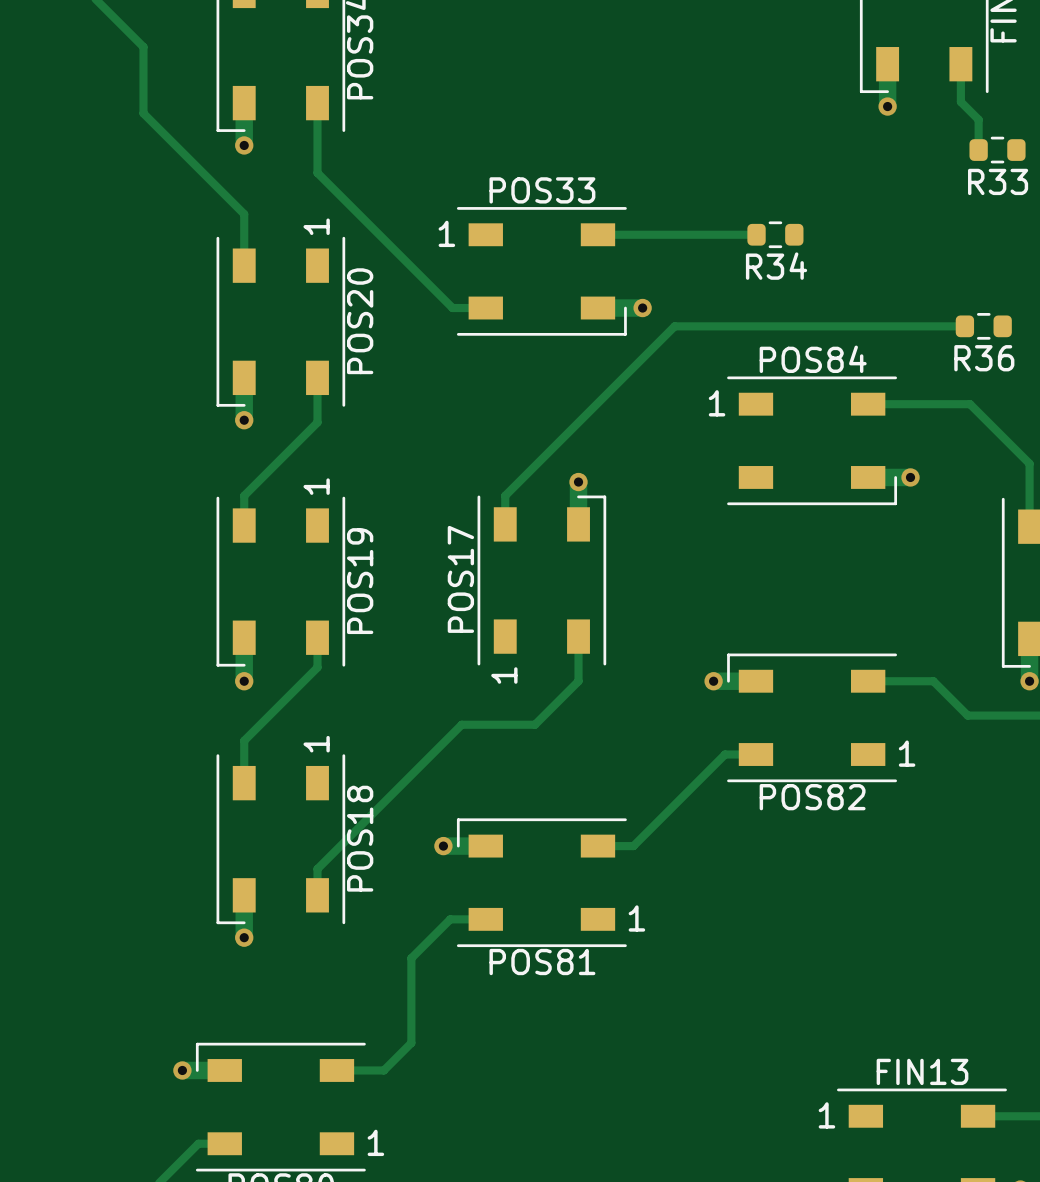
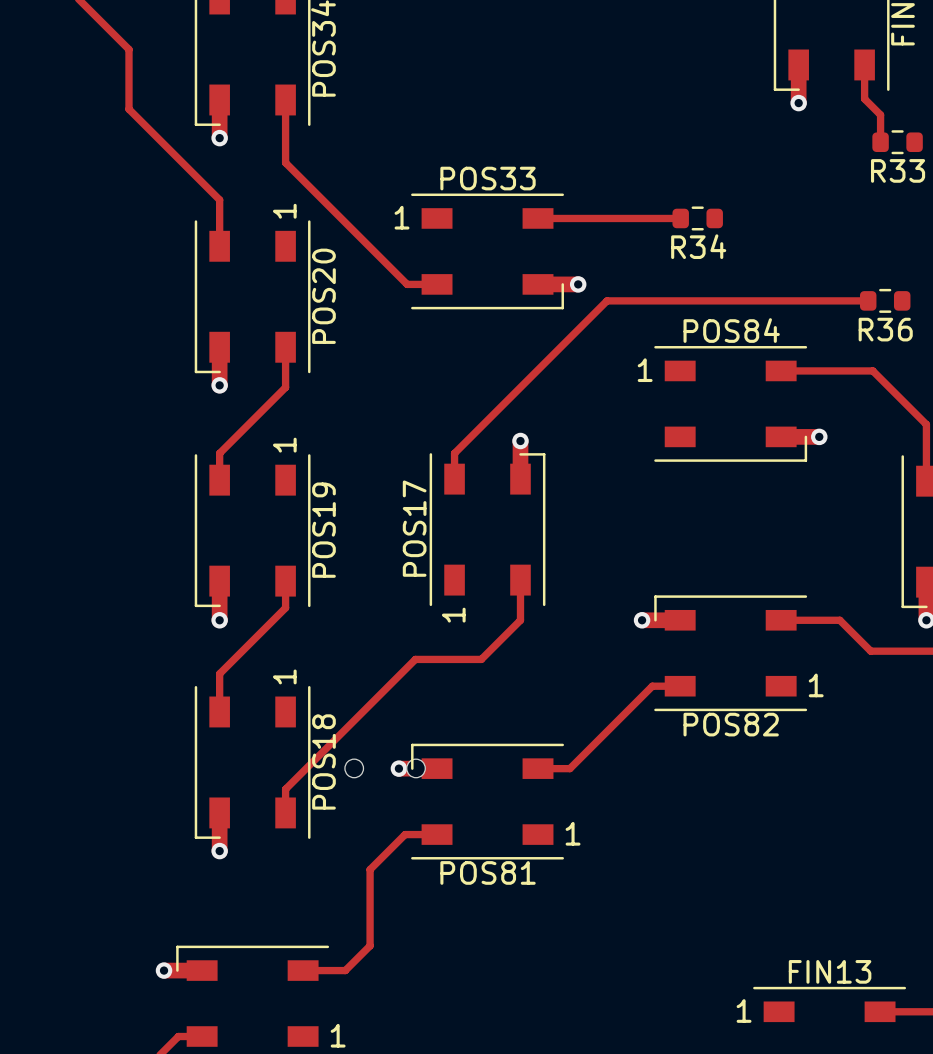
part: none -> (385, 768)

